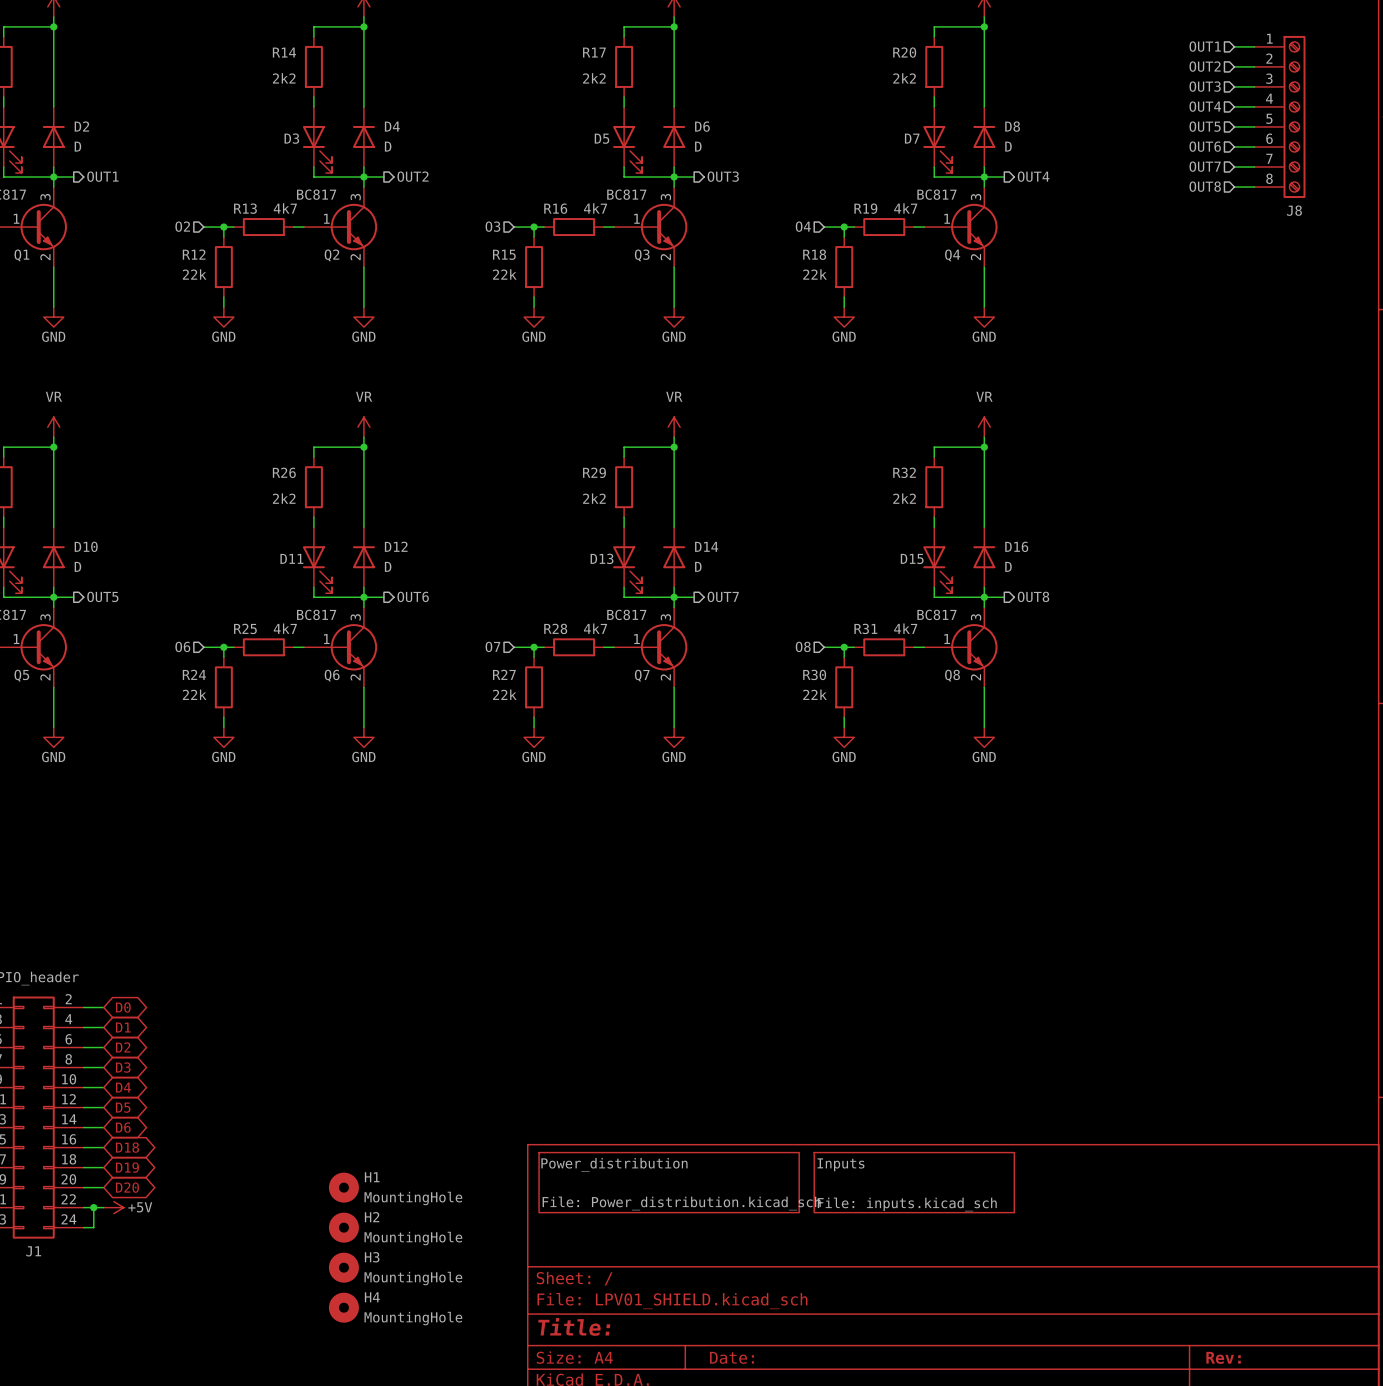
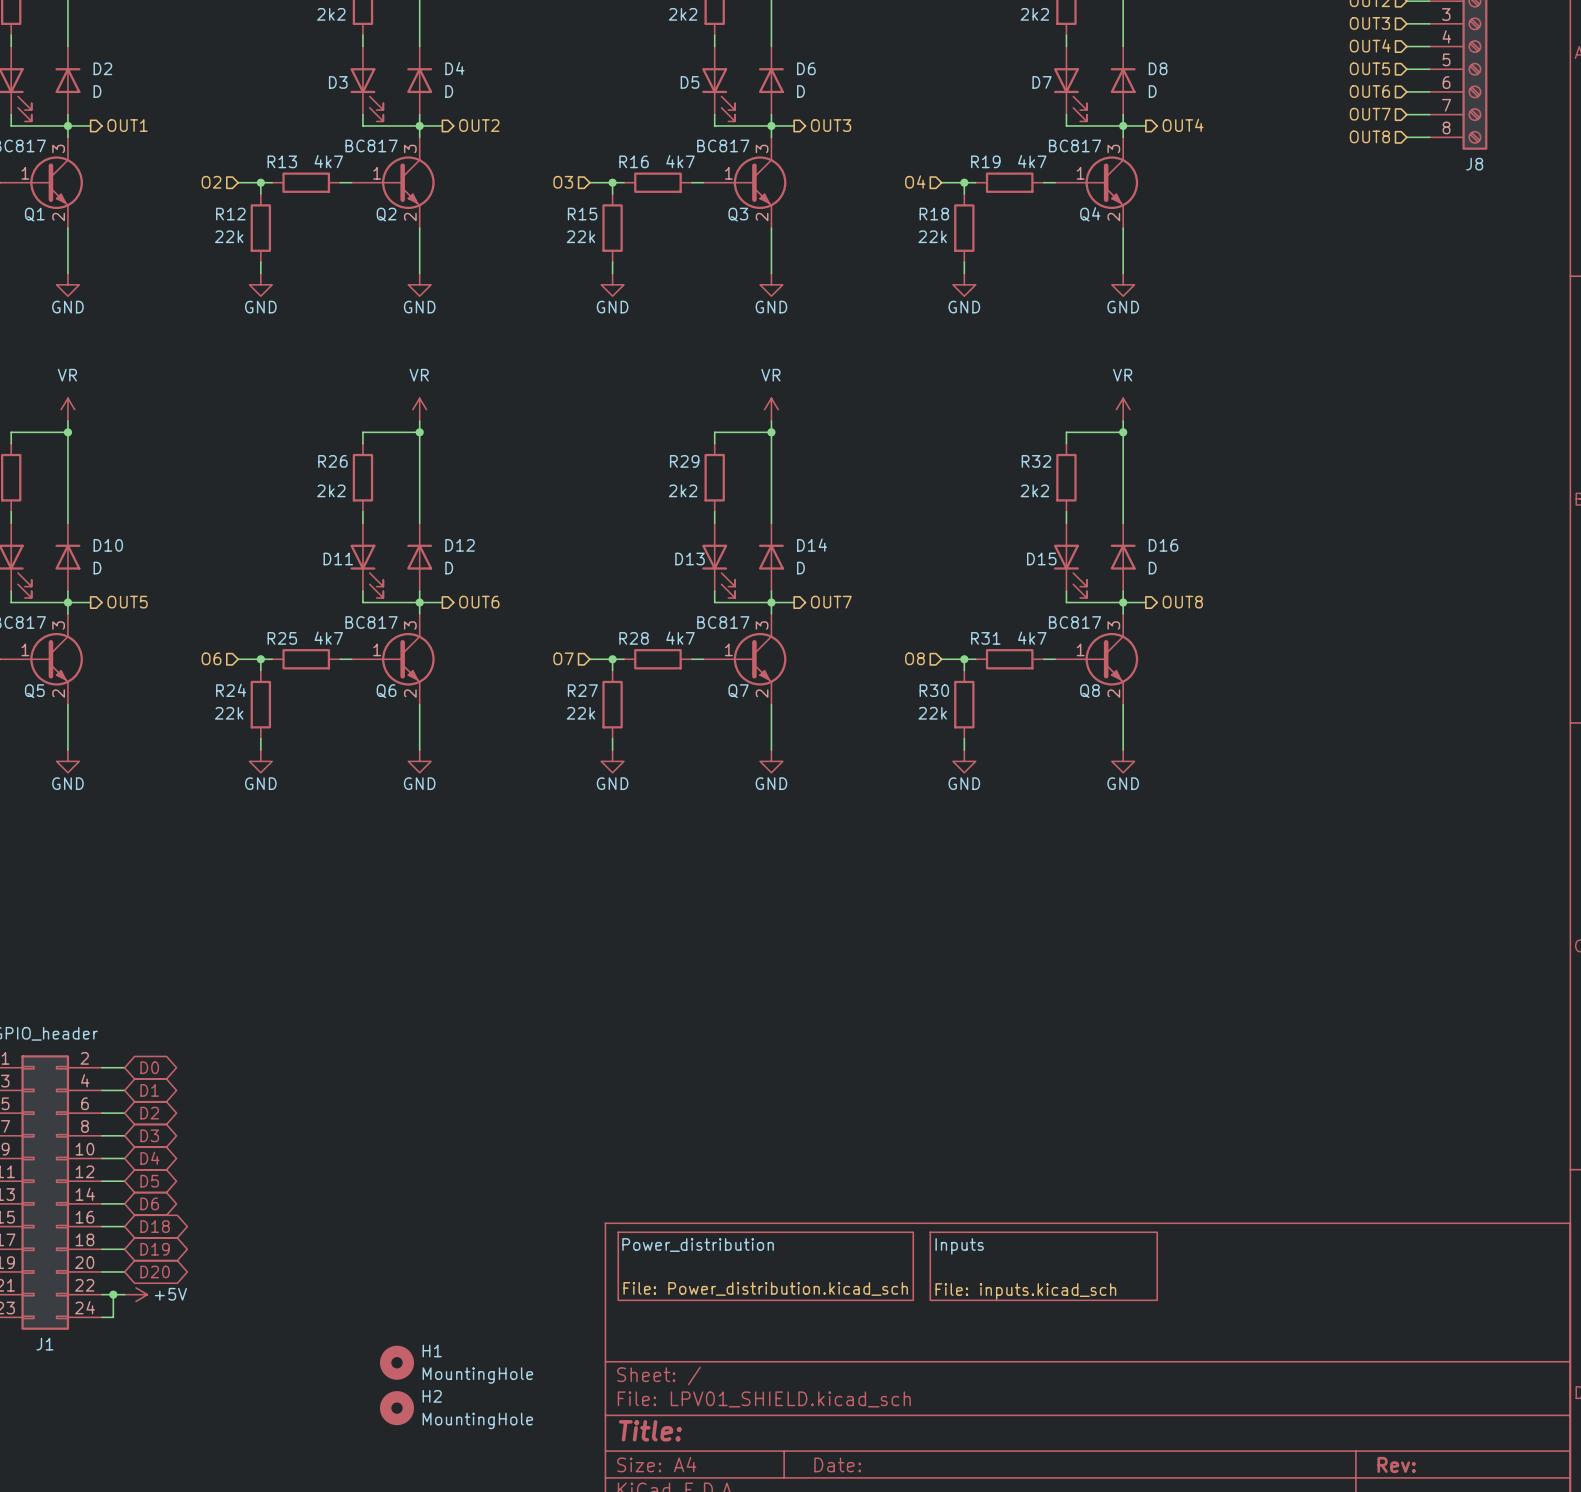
H1: MountingHole (343, 1187) -> none
H2: MountingHole (343, 1227) -> none
H3 name: H3 (372, 1257) -> H1 (432, 1350)
H4 name: H4 (372, 1297) -> H2 (432, 1396)

